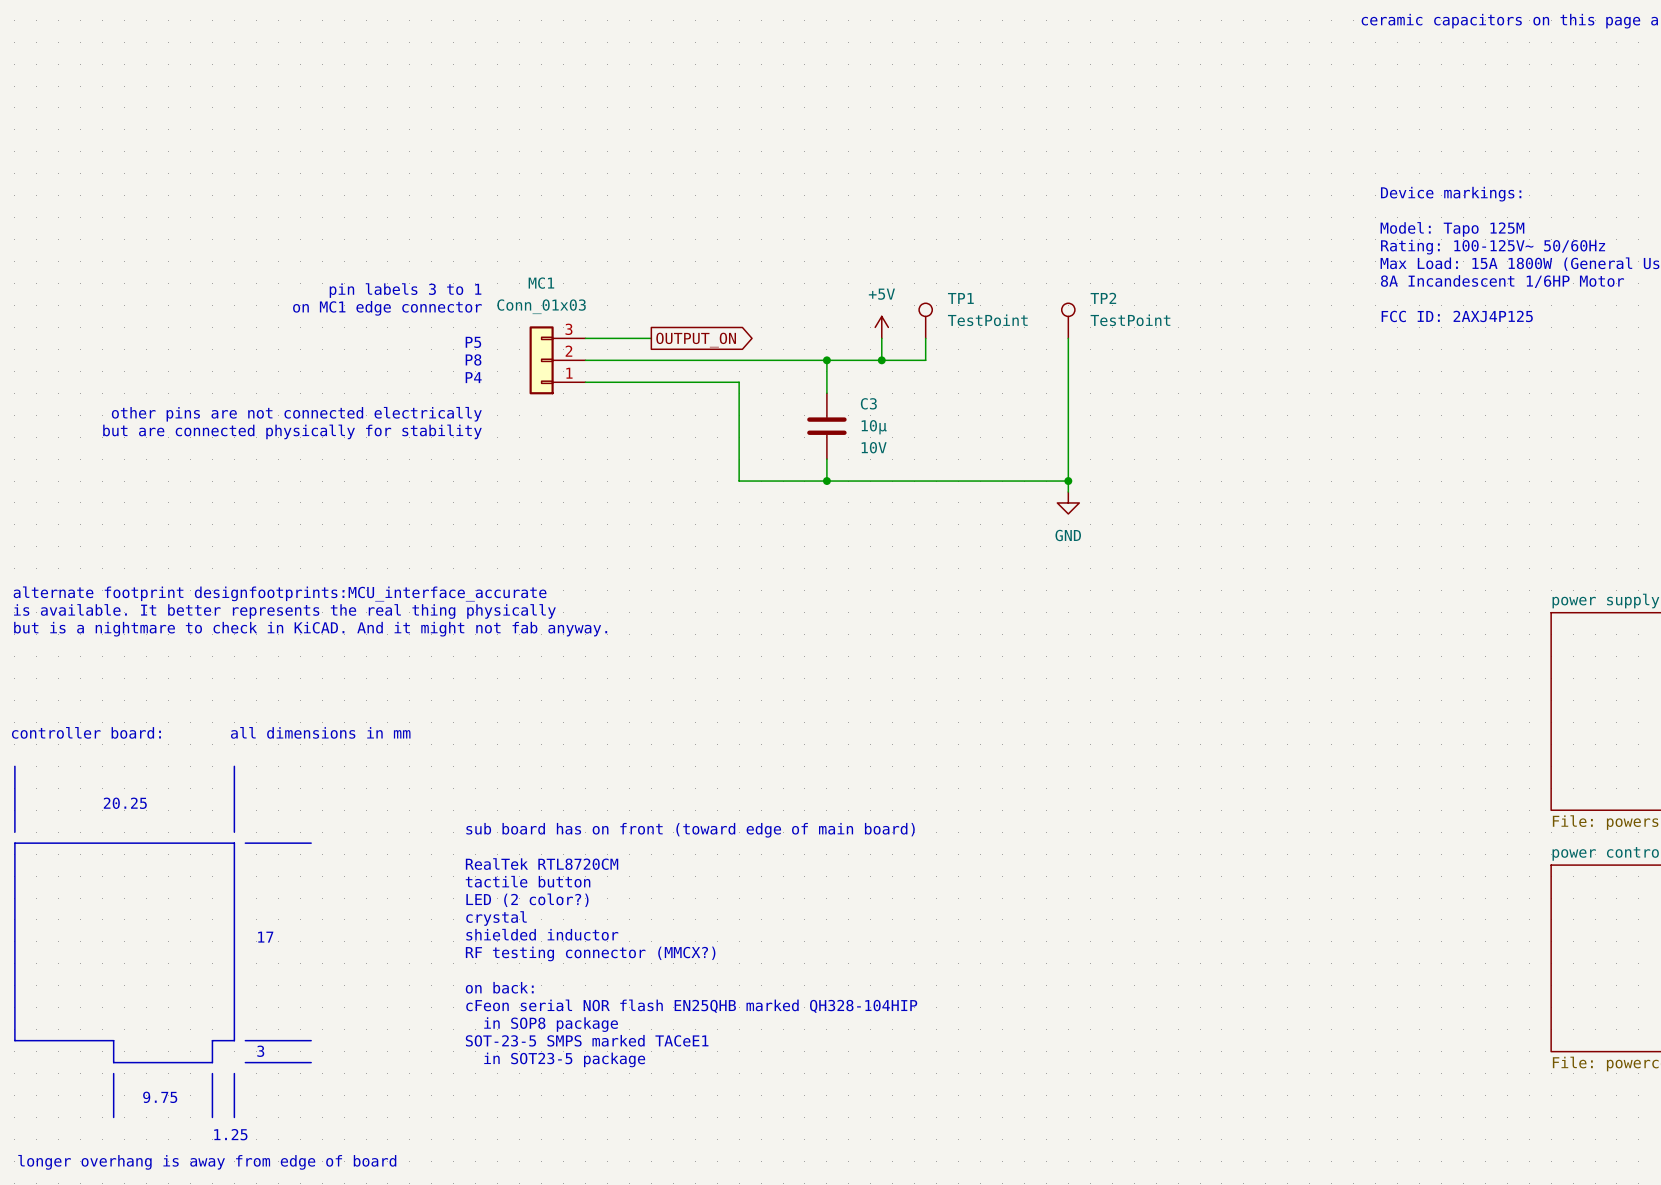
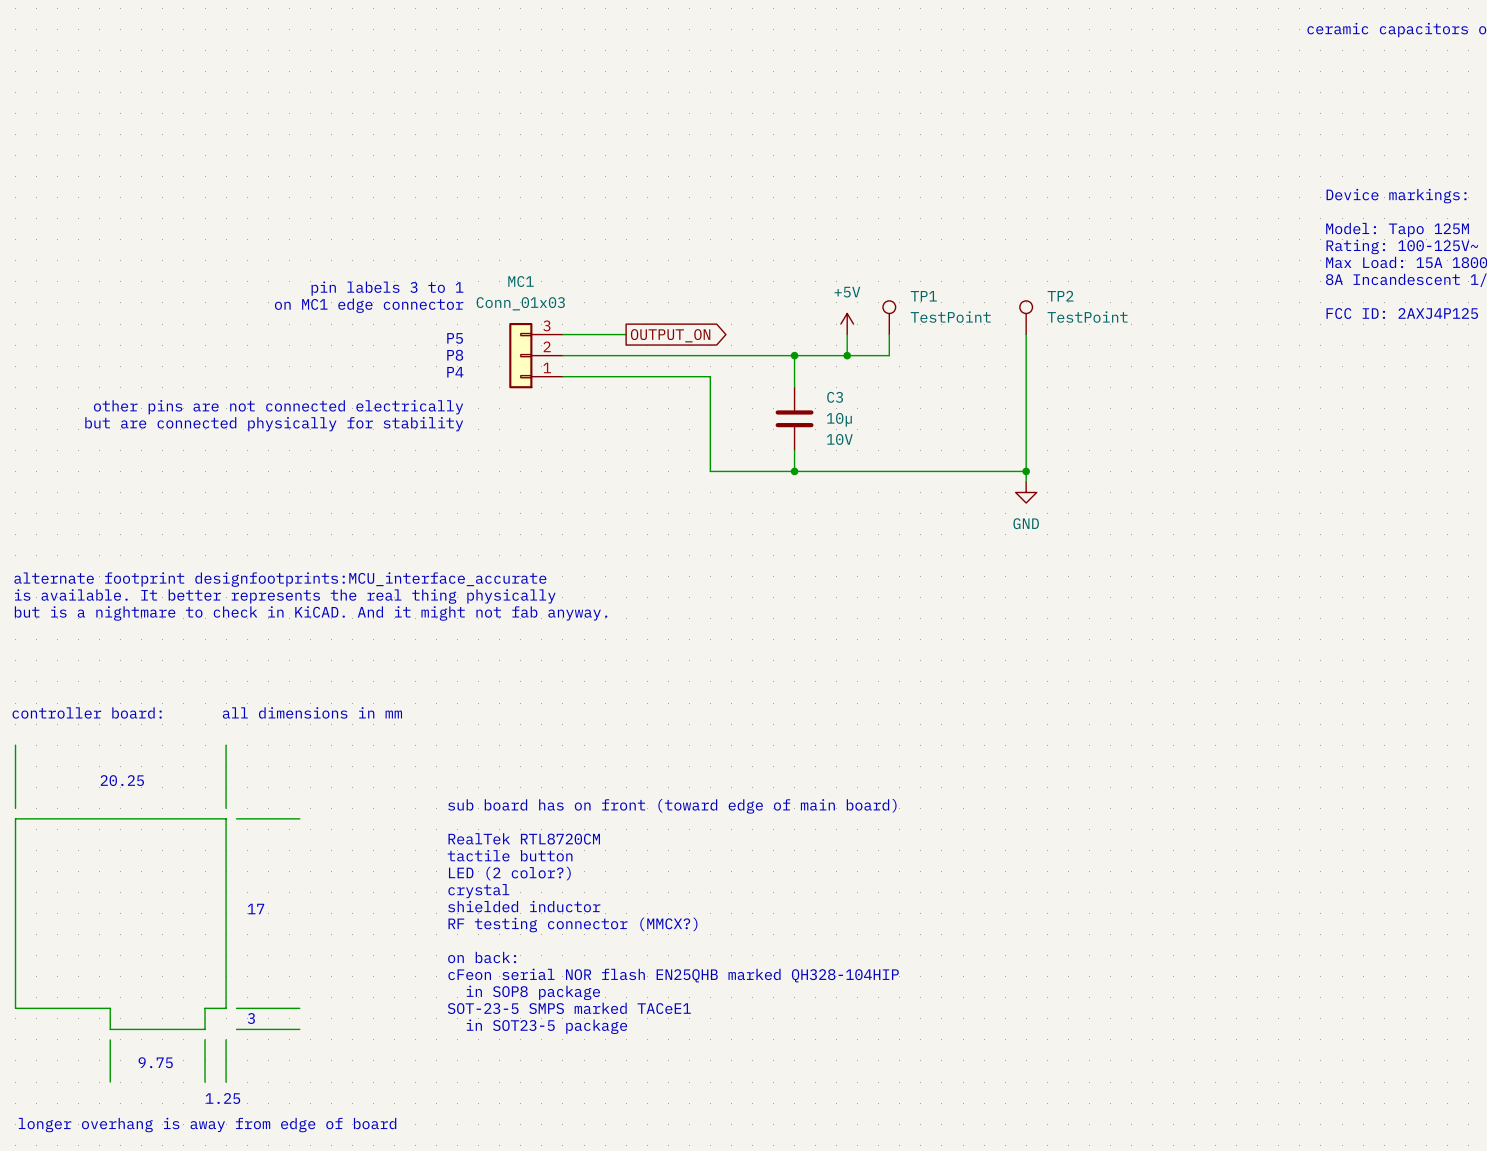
line: (14, 766) (14, 832) -> none
line: (234, 766) (234, 832) -> none
line: (14, 843) (14, 1040) (113, 1040) (113, 1062) (212, 1062) (212, 1040) (234, 1040) (234, 843) (14, 843) -> none
line: (245, 843) (311, 843) -> none
line: (245, 1040) (311, 1040) -> none
line: (245, 1062) (311, 1062) -> none
line: (113, 1073) (113, 1117) -> none
line: (212, 1073) (212, 1117) -> none
line: (234, 1073) (234, 1117) -> none

